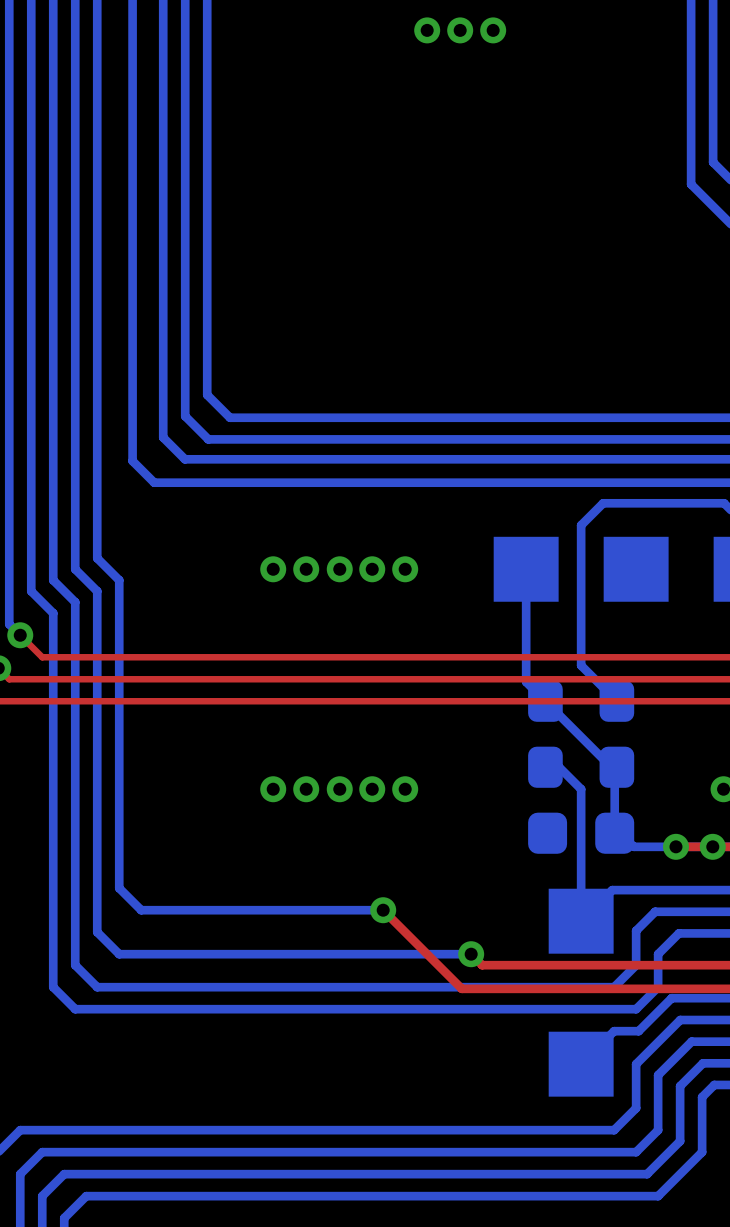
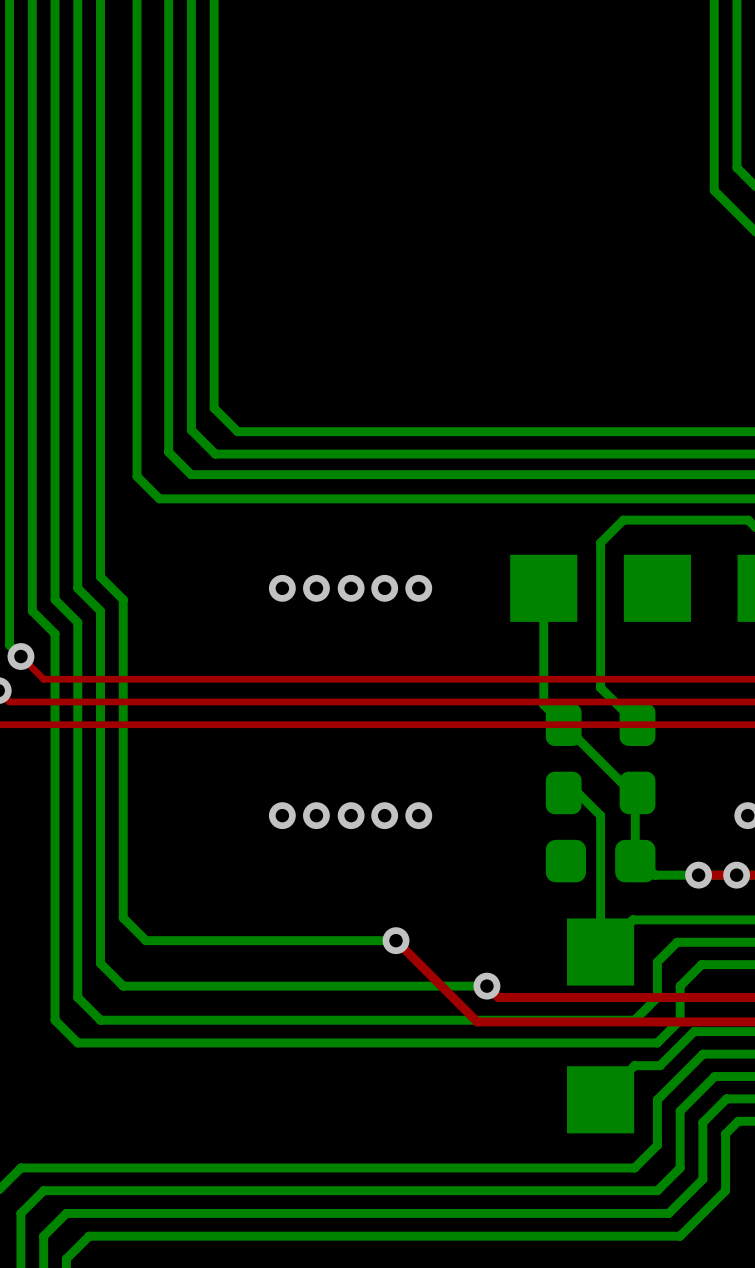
via: (427, 30) -> none
via: (460, 30) -> none
via: (493, 30) -> none

